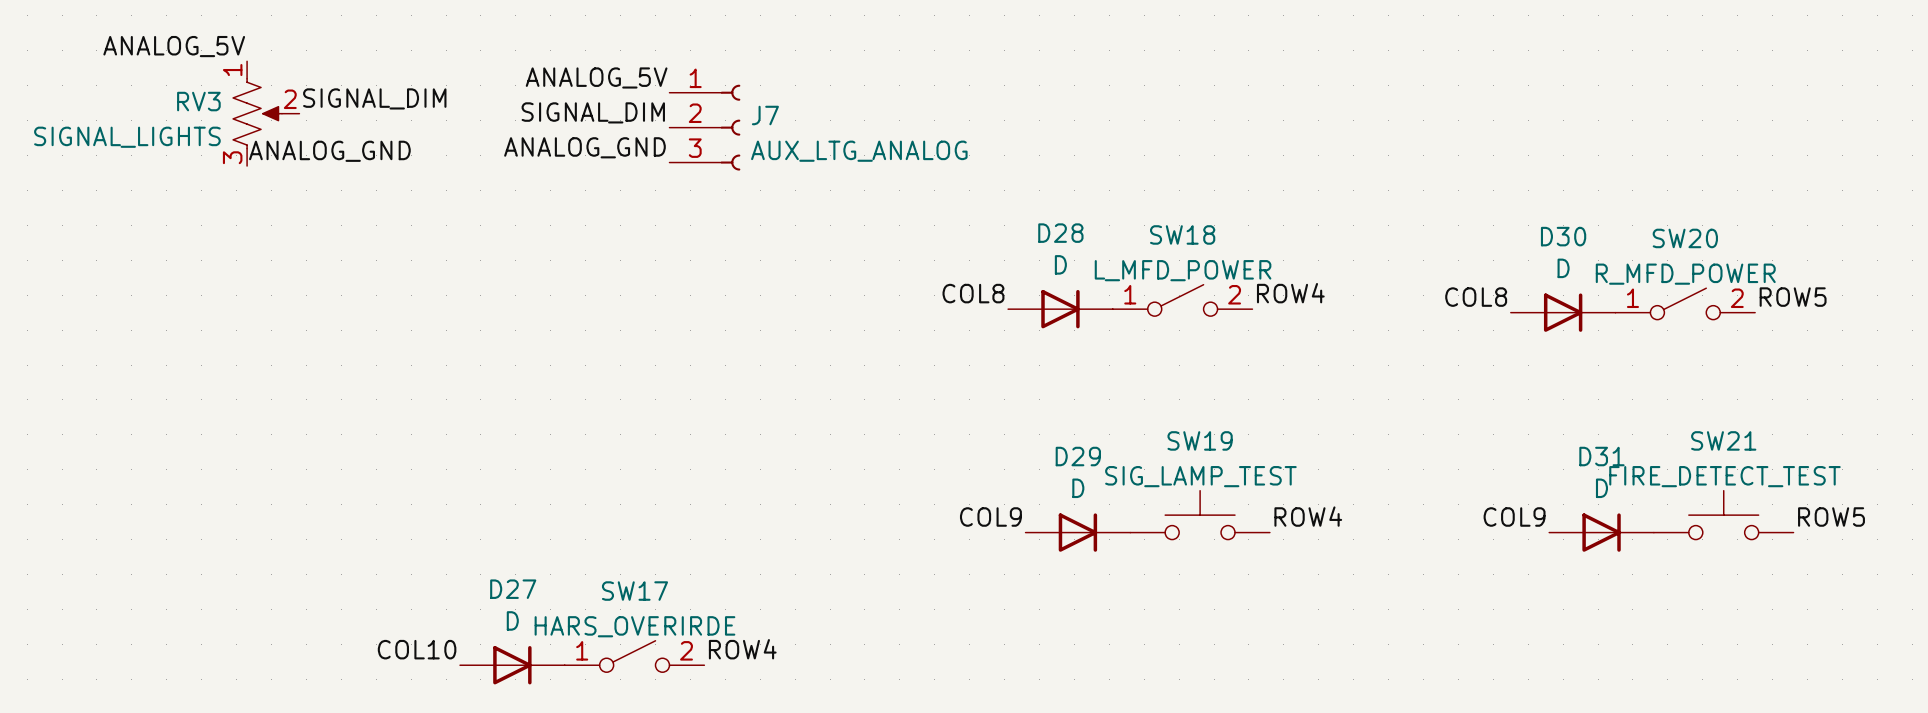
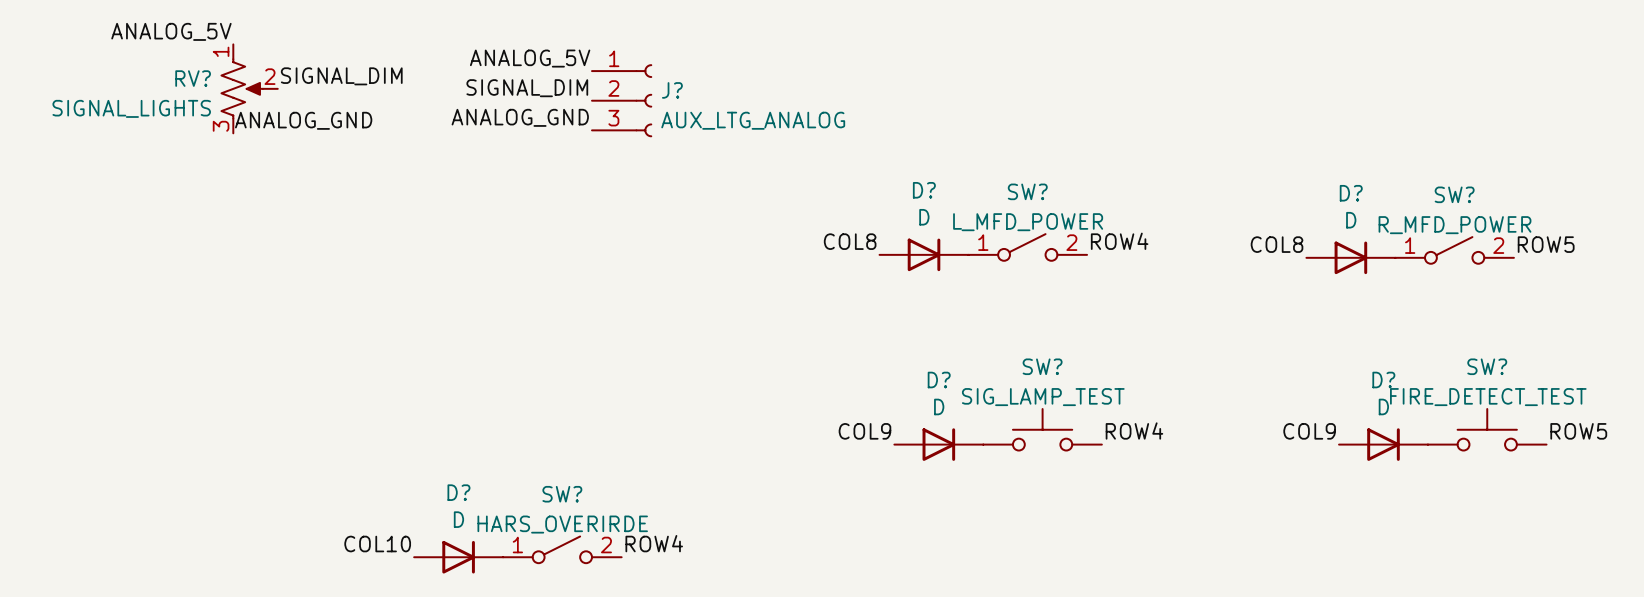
RV3 name: RV3 (198, 101) -> RV? (193, 78)
J7 name: J7 (765, 115) -> J? (672, 90)
D28 name: D28 (1060, 233) -> D? (924, 190)
SW18 name: SW18 (1182, 234) -> SW? (1027, 191)
D30 name: D30 (1563, 236) -> D? (1351, 193)
SW20 name: SW20 (1685, 238) -> SW? (1454, 194)
SW19 name: SW19 (1200, 440) -> SW? (1042, 366)
SW21 name: SW21 (1723, 440) -> SW? (1487, 366)
D29 name: D29 (1078, 456) -> D? (939, 380)
D31 name: D31 (1601, 456) -> D? (1383, 380)
D27 name: D27 (513, 589) -> D? (458, 492)
SW17 name: SW17 (634, 591) -> SW? (562, 494)

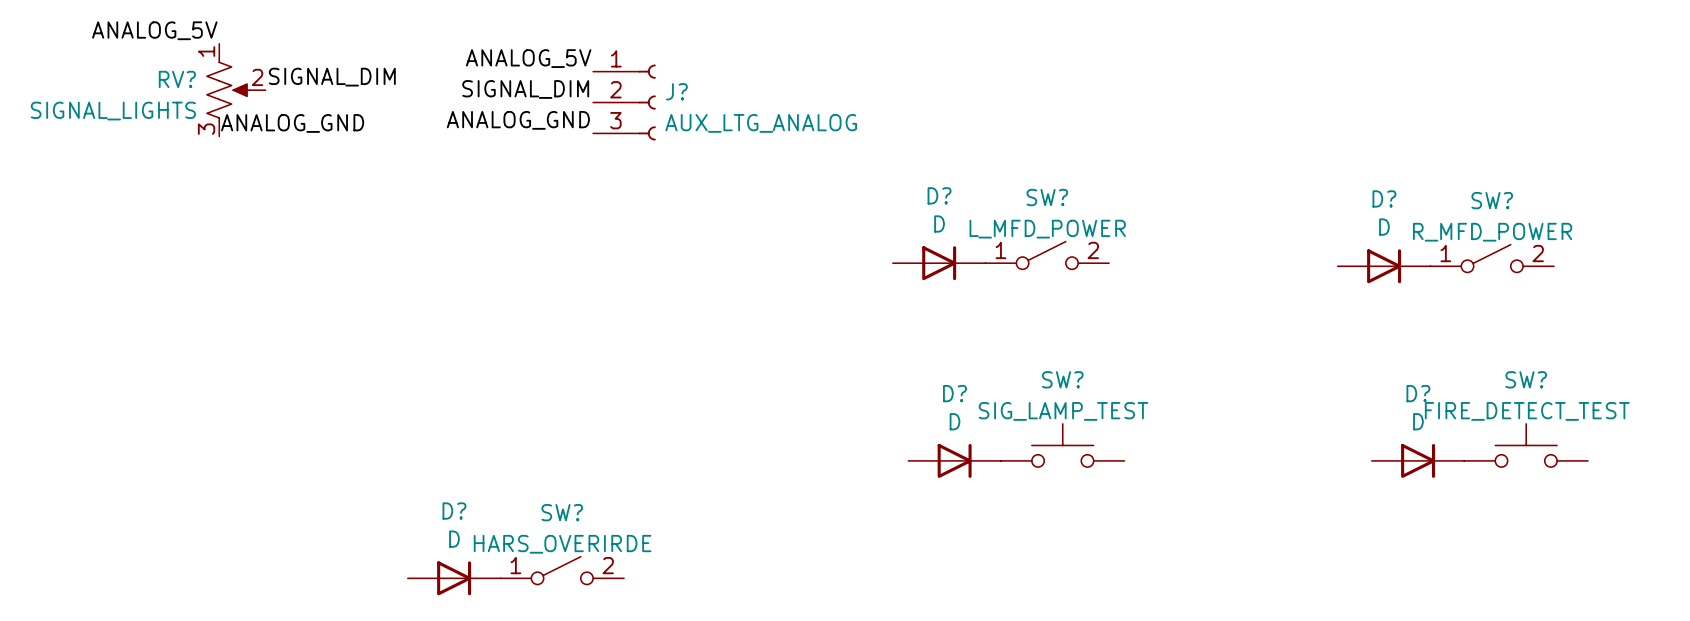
label: COL8 (850, 241) -> none
label: ROW4 (1119, 241) -> none
label: COL8 (1277, 244) -> none
label: ROW5 (1546, 244) -> none
label: COL9 (864, 431) -> none
label: ROW4 (1134, 431) -> none
label: COL9 (1309, 431) -> none
label: ROW5 (1578, 431) -> none
label: ROW4 (654, 543) -> none
label: COL10 (377, 544) -> none

